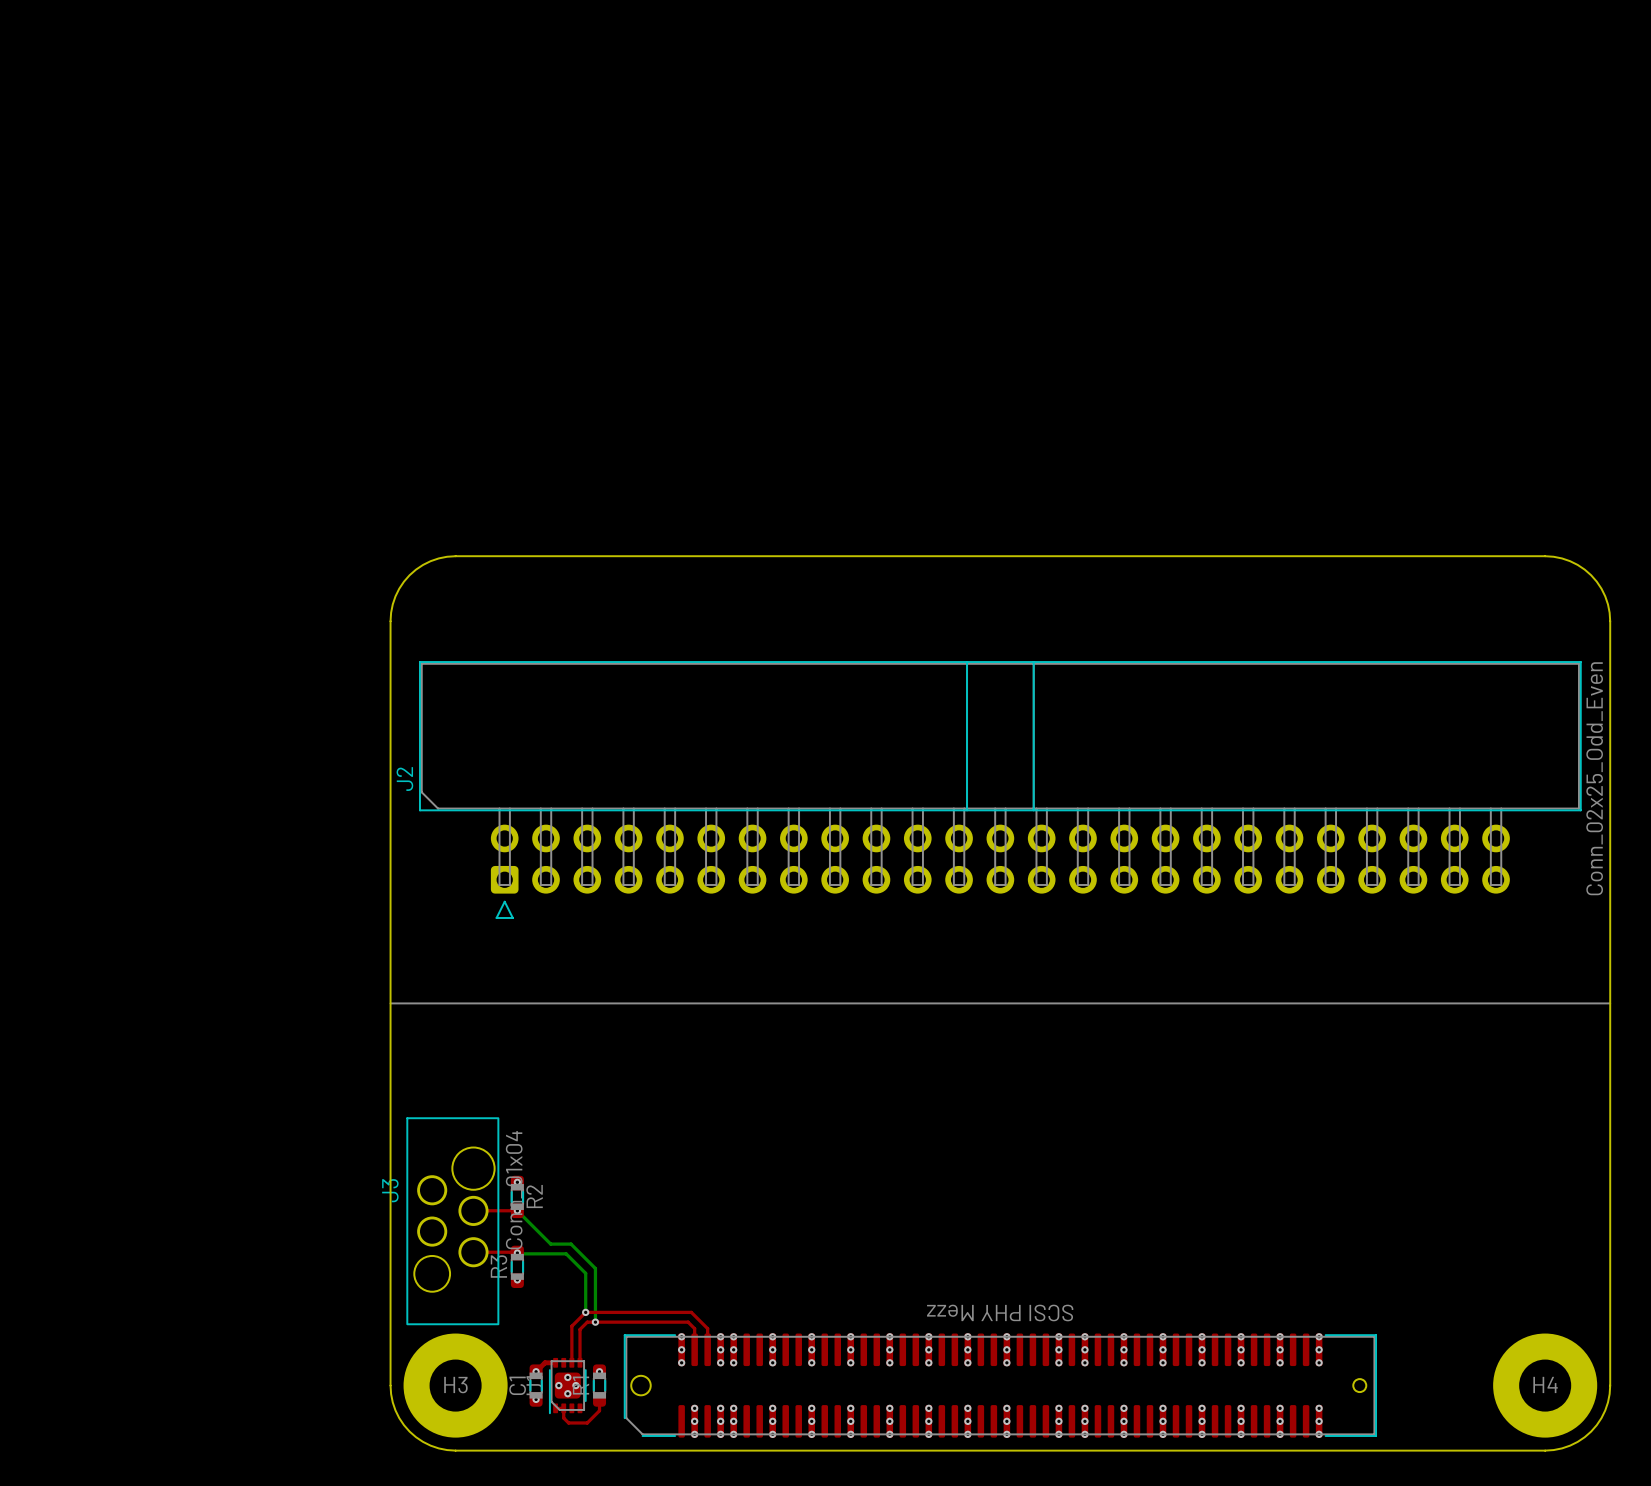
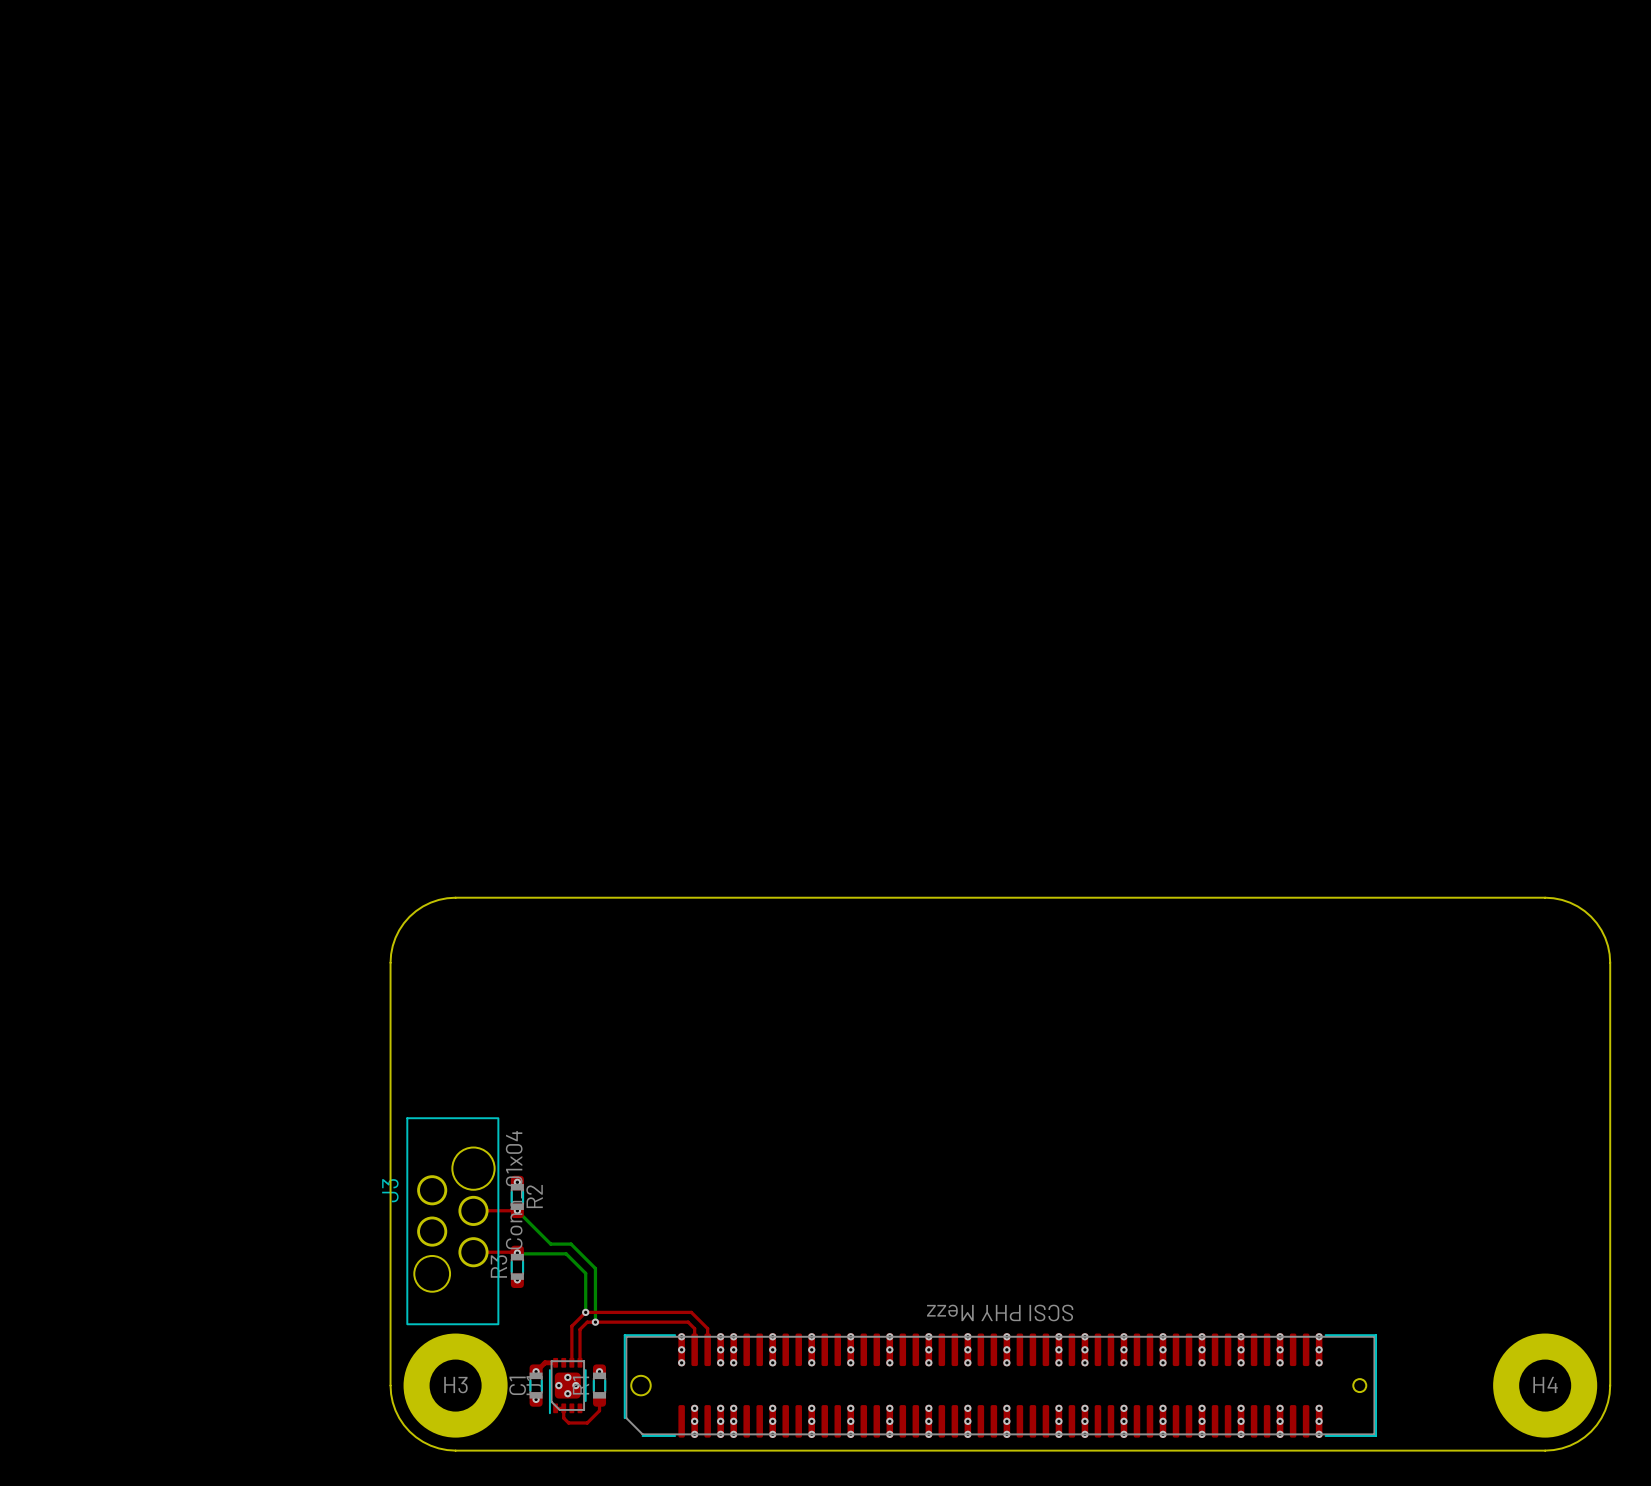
J2: Conn_02x25_Odd_Even (1000, 790) -> none
board edge: (390, 962) (391, 612) (399, 588) (409, 575) (430, 561) (455, 556) (1545, 556) (1570, 561) (1584, 569) (1596, 581) (1605, 596) (1609, 612) (1610, 962) -> (390, 962) (395, 937) (409, 916) (430, 902) (455, 897) (1545, 897) (1570, 902) (1591, 916) (1605, 937) (1610, 962)
line: (390, 1003) (1610, 1003) -> none

